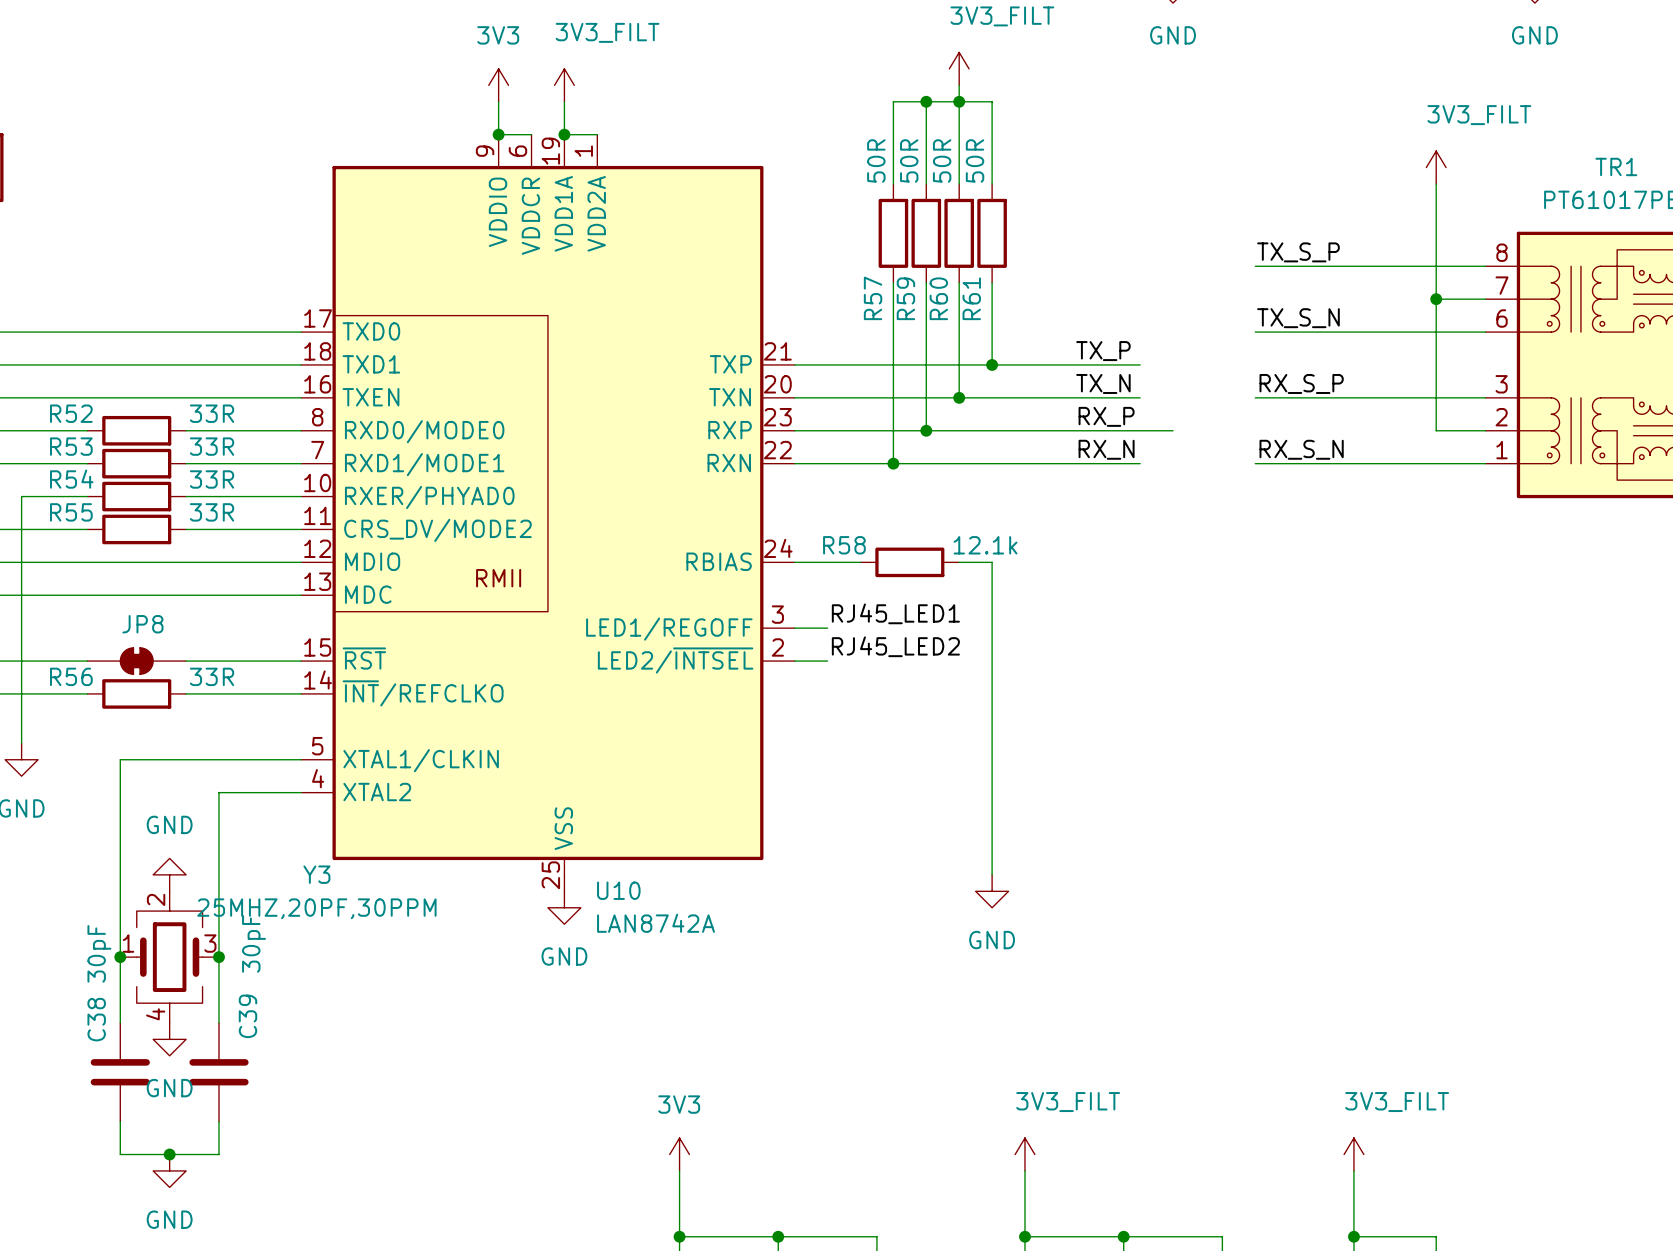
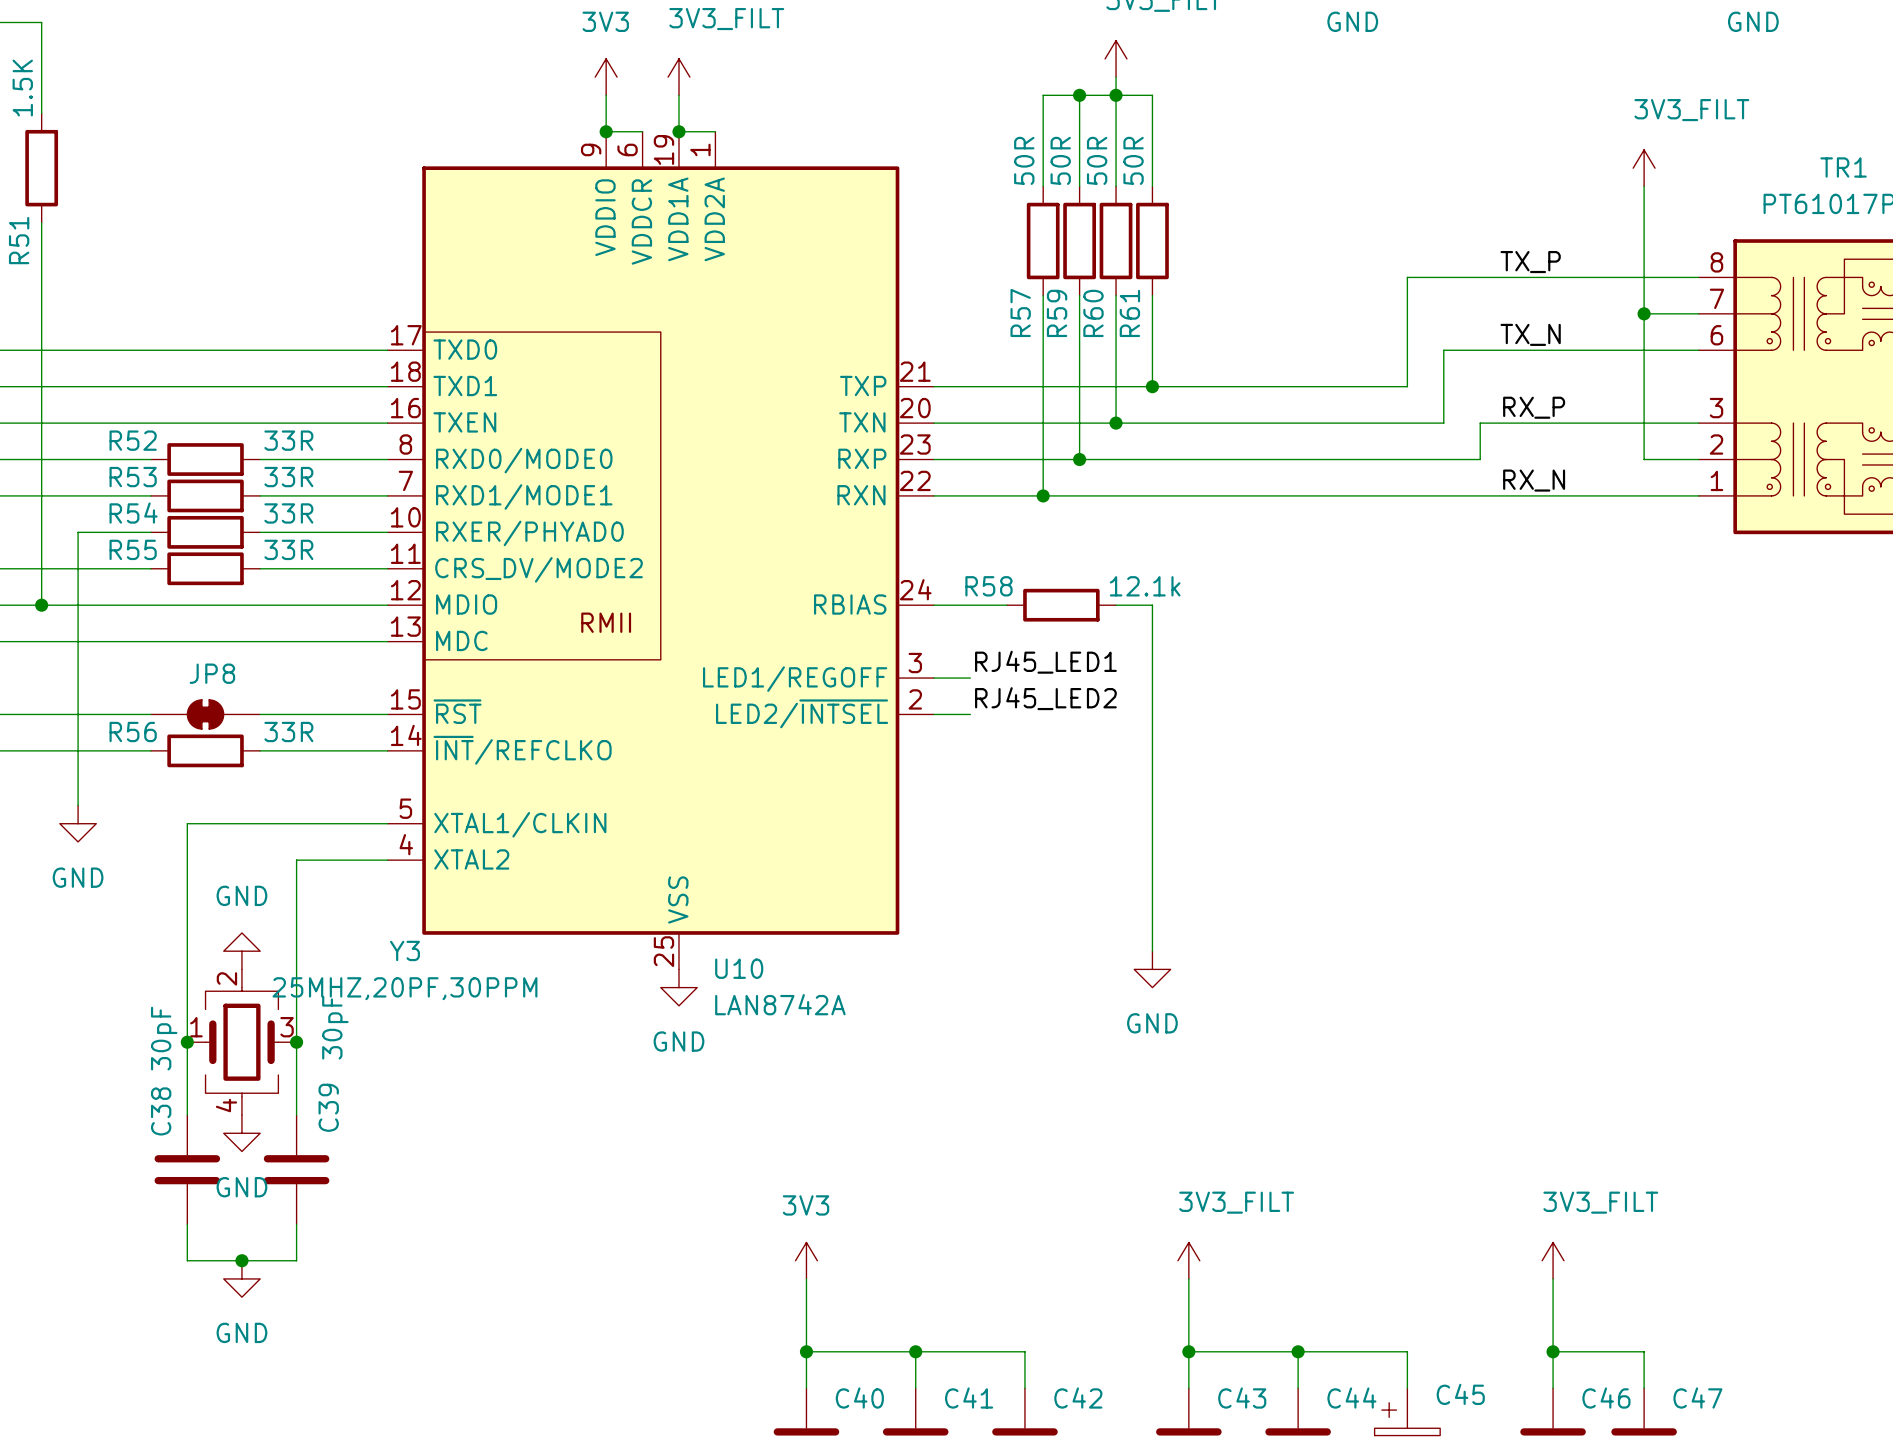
label: TX_S_P (1298, 252) -> none
wire: none -> (1443, 277) (1407, 277) (1407, 386) (1316, 386)
label: TX_S_N (1298, 318) -> none
wire: none -> (1443, 350) (1443, 423) (1316, 423)
label position: TX_P (1103, 351) -> TX_P (1530, 262)
label position: TX_N (1103, 383) -> TX_N (1530, 334)
label: RX_S_P (1301, 383) -> none
wire: (1255, 397) (1288, 397) -> (1352, 459) (1480, 459) (1480, 423)
label position: RX_P (1106, 416) -> RX_P (1534, 407)
label position: RX_N (1106, 449) -> RX_N (1534, 480)
label: RX_S_N (1301, 449) -> none
wire: none -> (1316, 495) (1443, 495)

